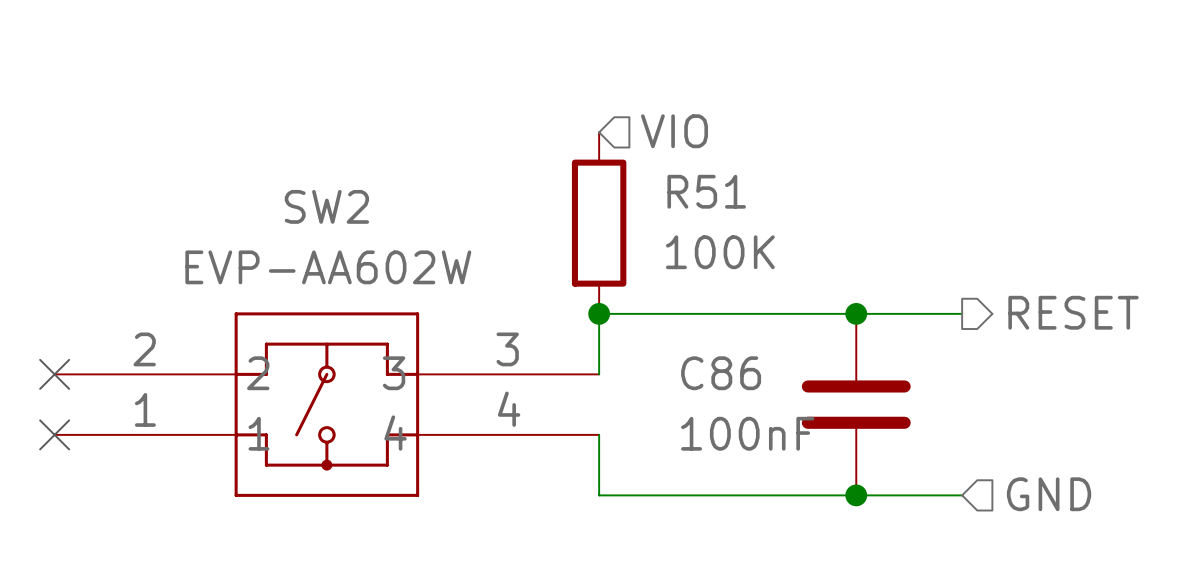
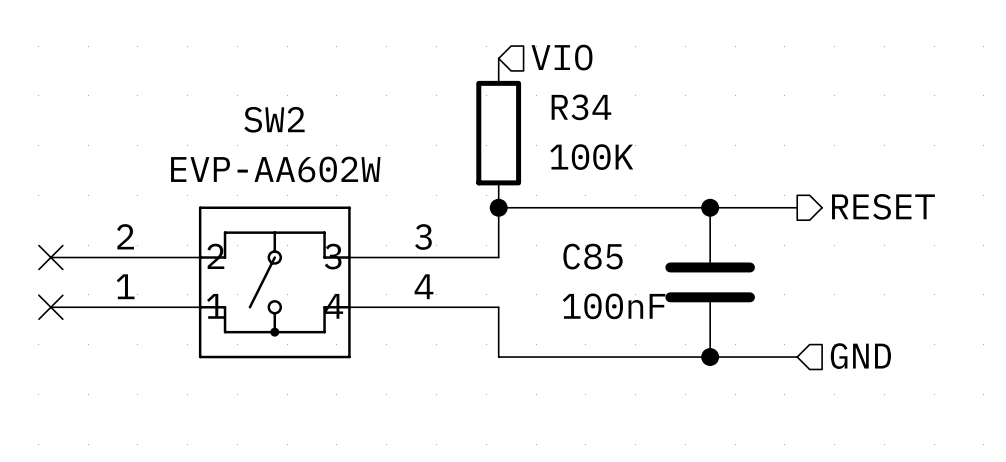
R51 name: R51 (706, 191) -> R34 (581, 107)
C86 name: C86 (721, 373) -> C85 (593, 256)

